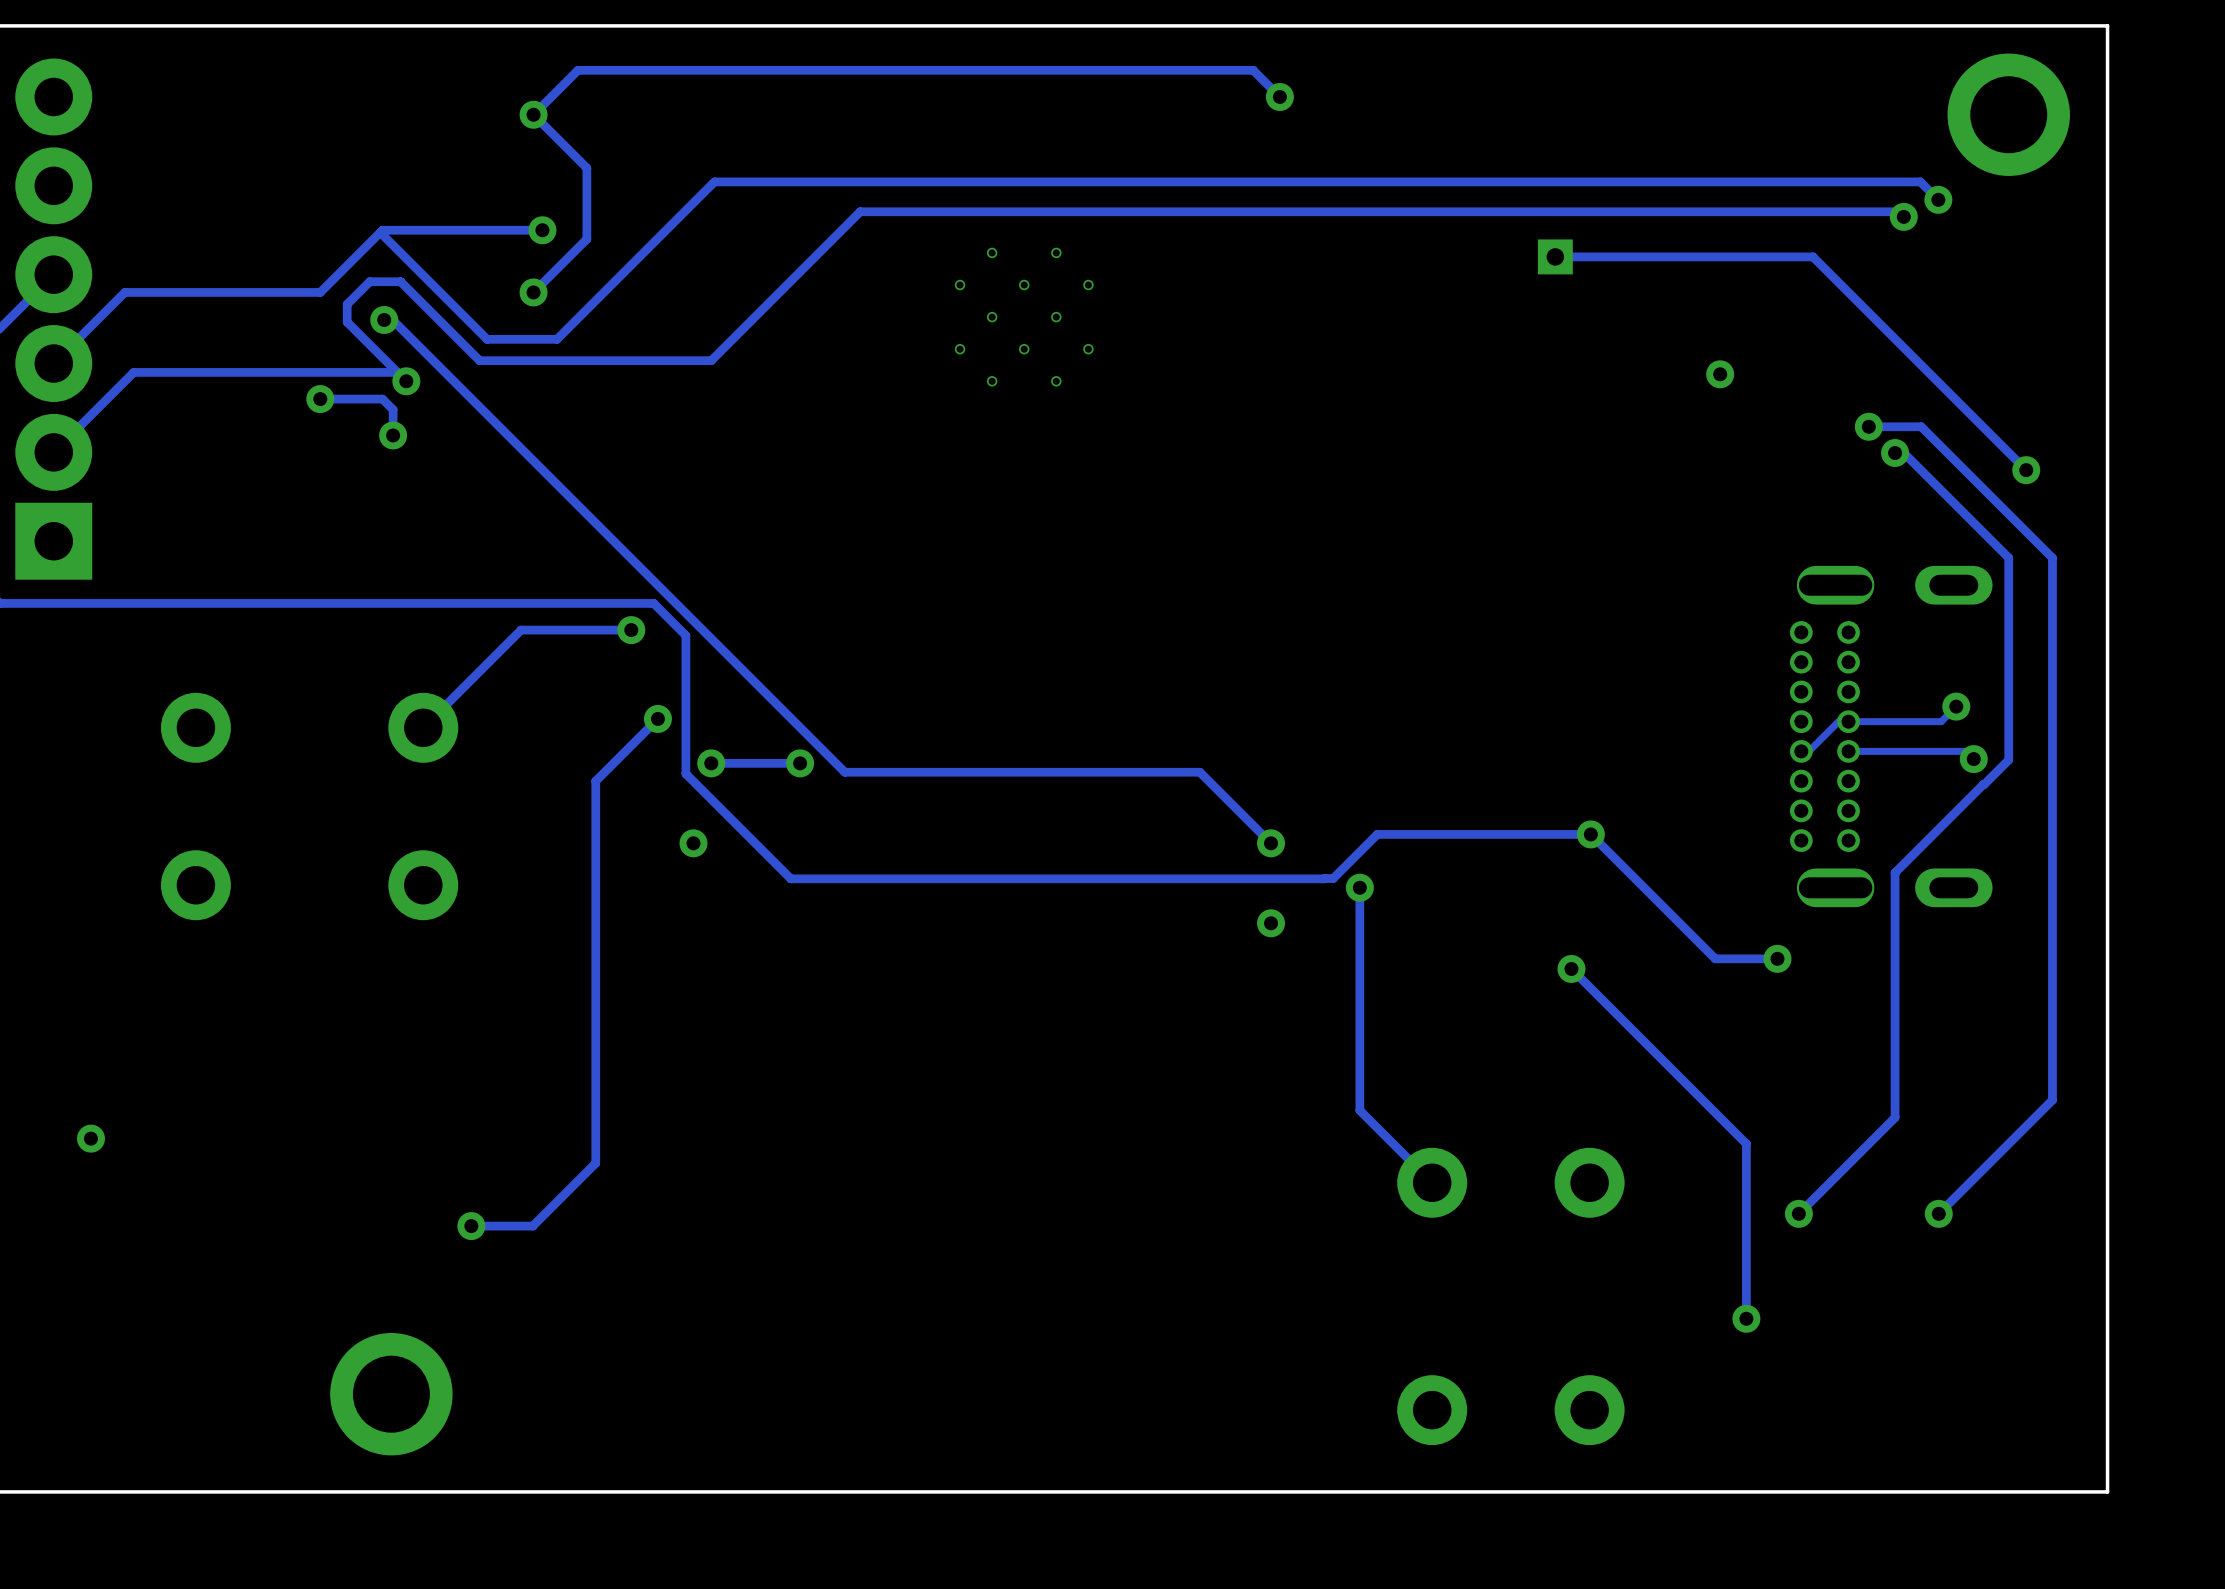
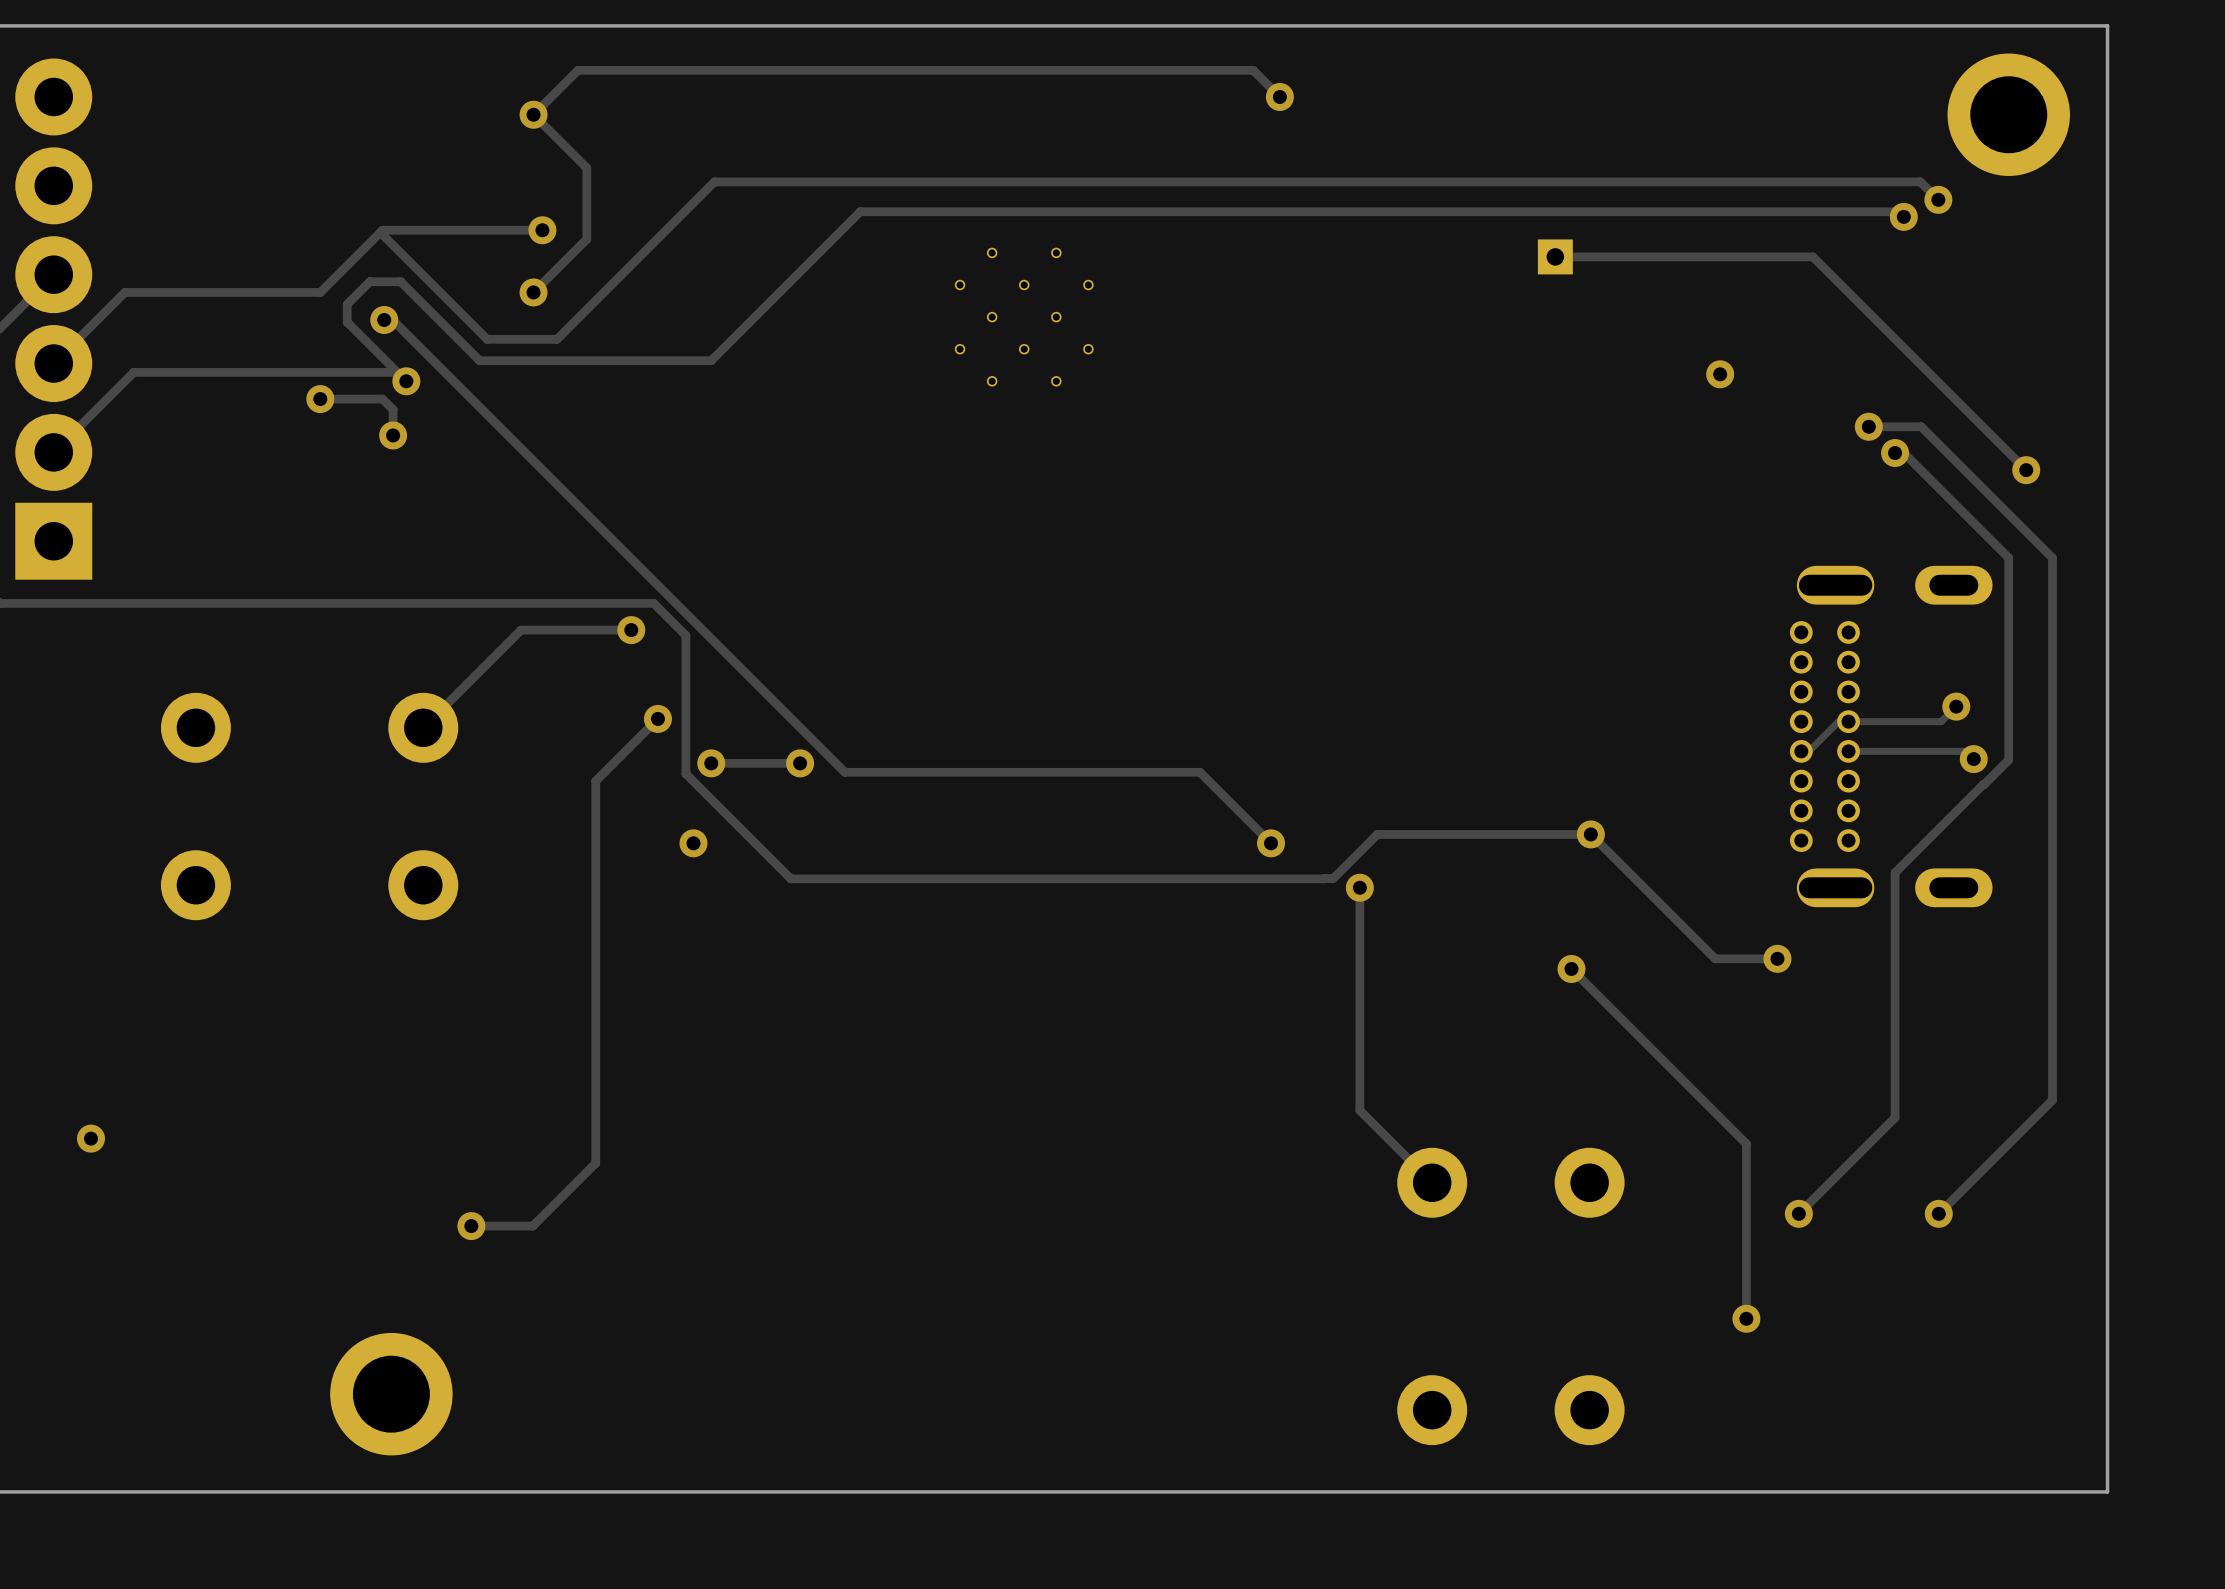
via: (1271, 923) -> none

